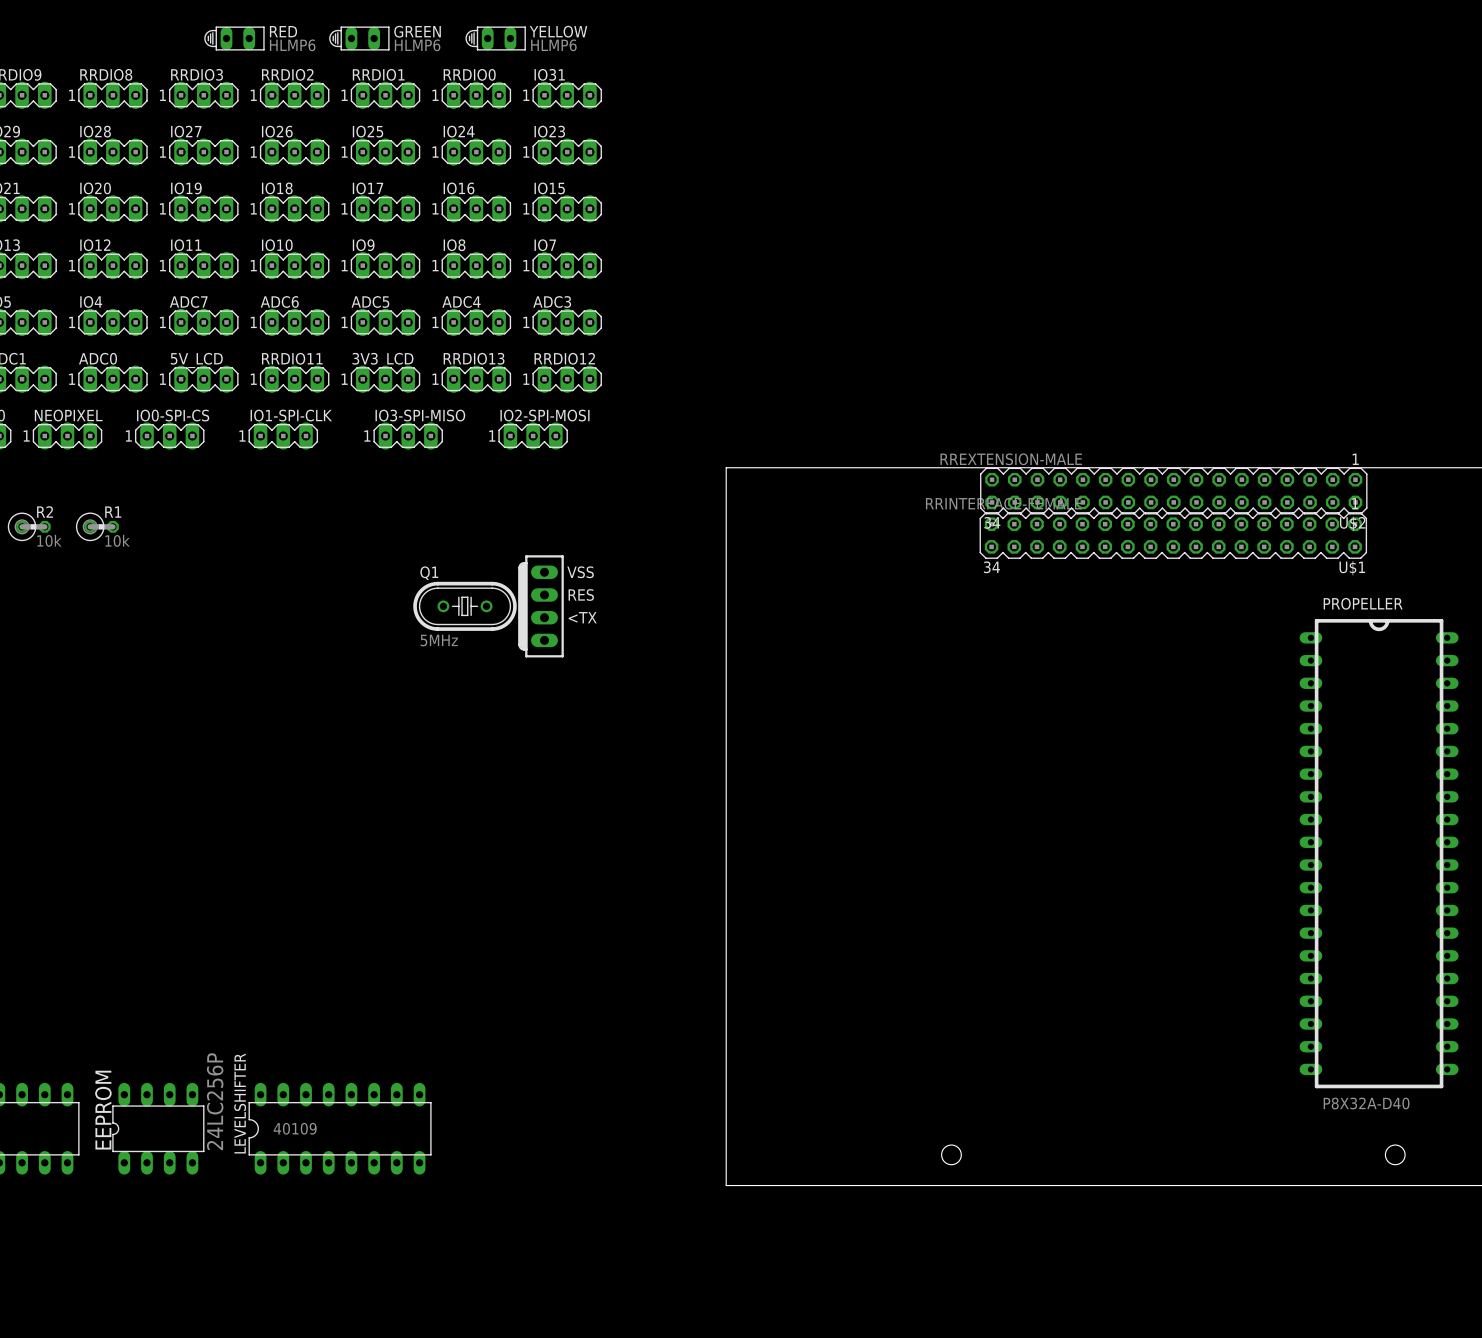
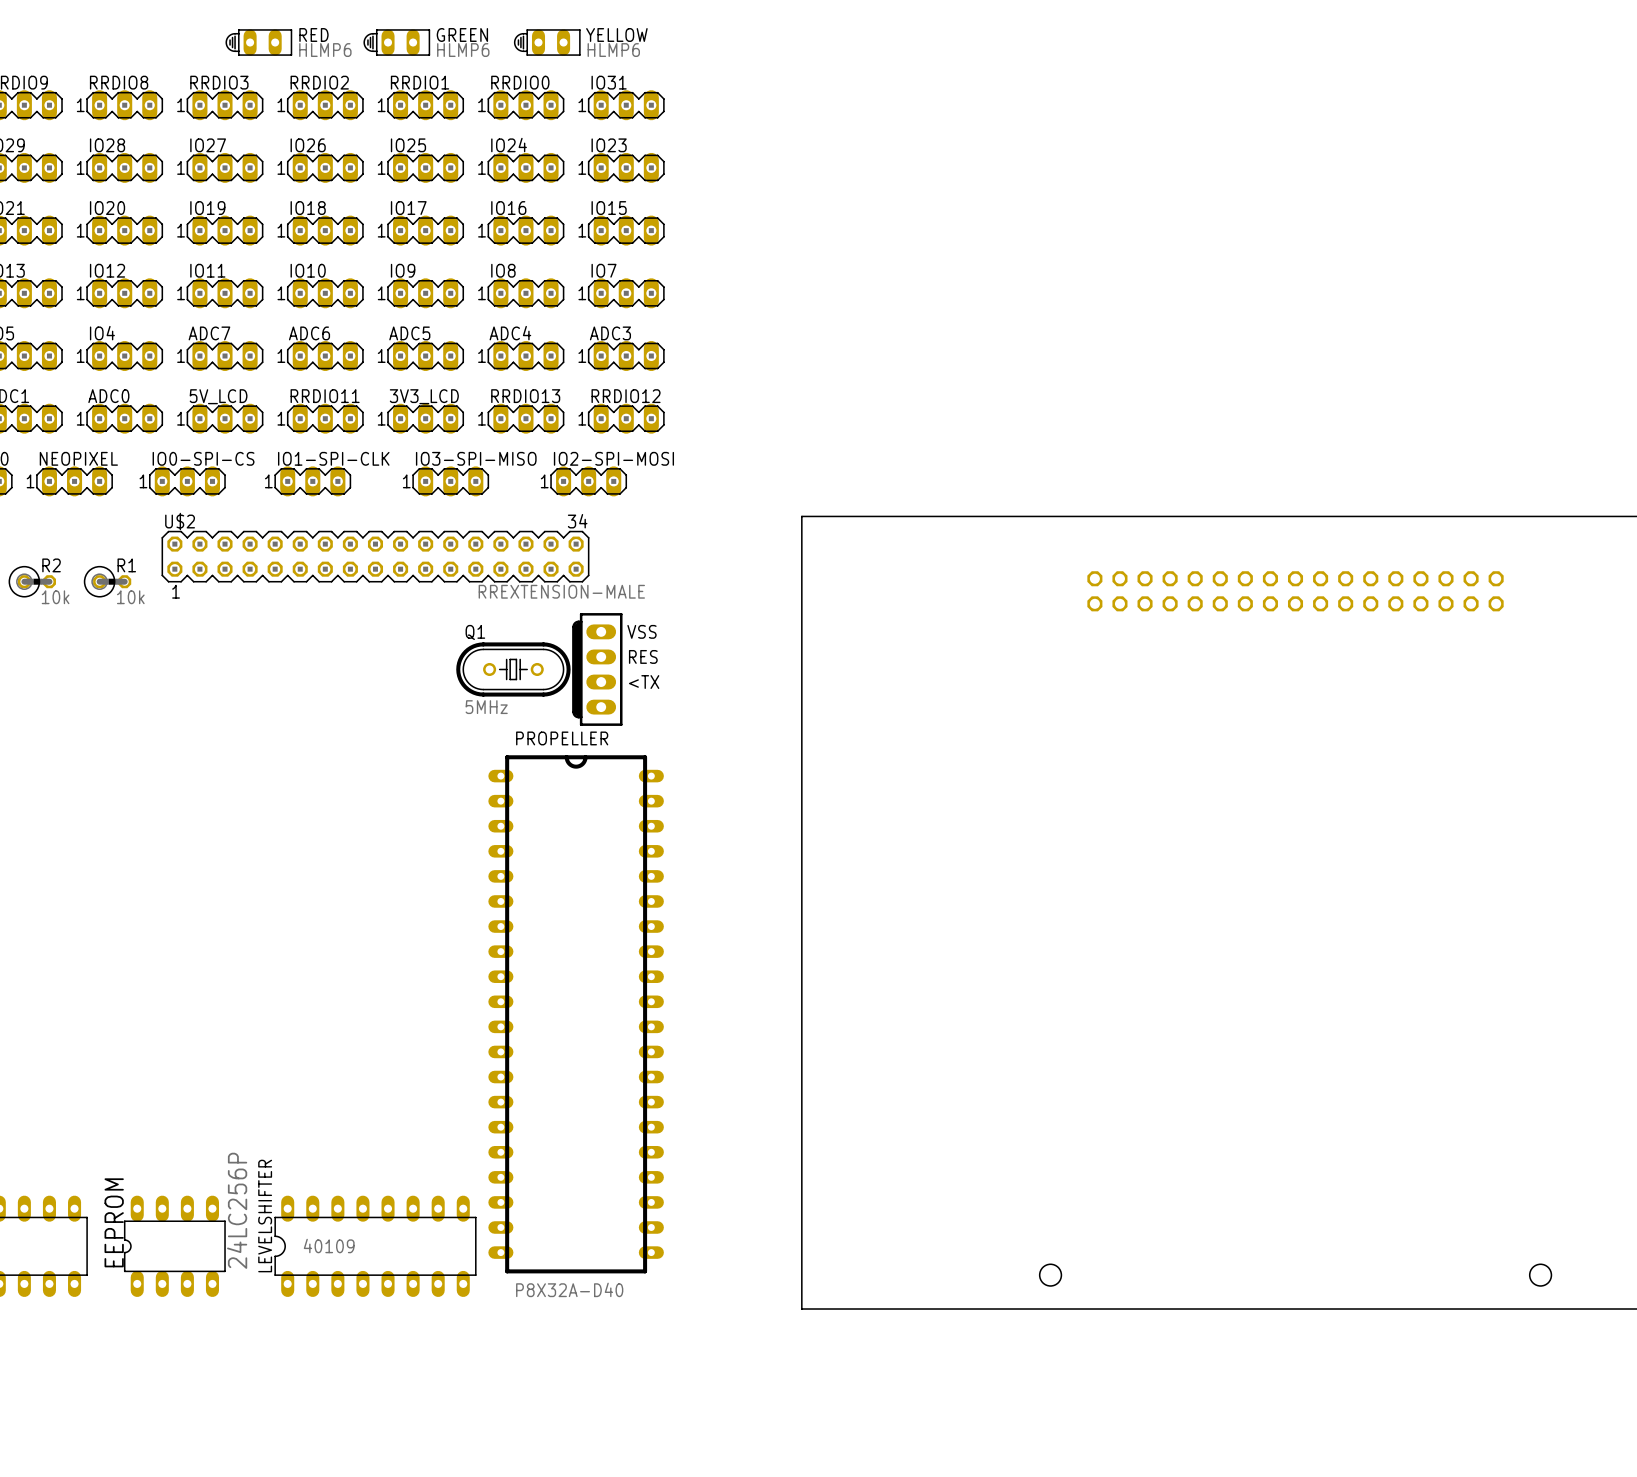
U$2 value position: RREXTENSION-MALE (1011, 459) -> RREXTENSION-MALE (561, 591)
U$2 text position: 1 (1355, 459) -> 1 (176, 591)
U$2 position: (1173, 491) -> (375, 556)
U$2 text position: 34 (992, 522) -> 34 (577, 521)
U$2 name position: U$2 (1352, 523) -> U$2 (180, 521)
U$1 side: top (1173, 535) -> bottom (1295, 591)
PROPELLER: P8X32A-D40 (1379, 853) -> none
PROPELLER: none -> P8X32A-D40 (576, 1014)

